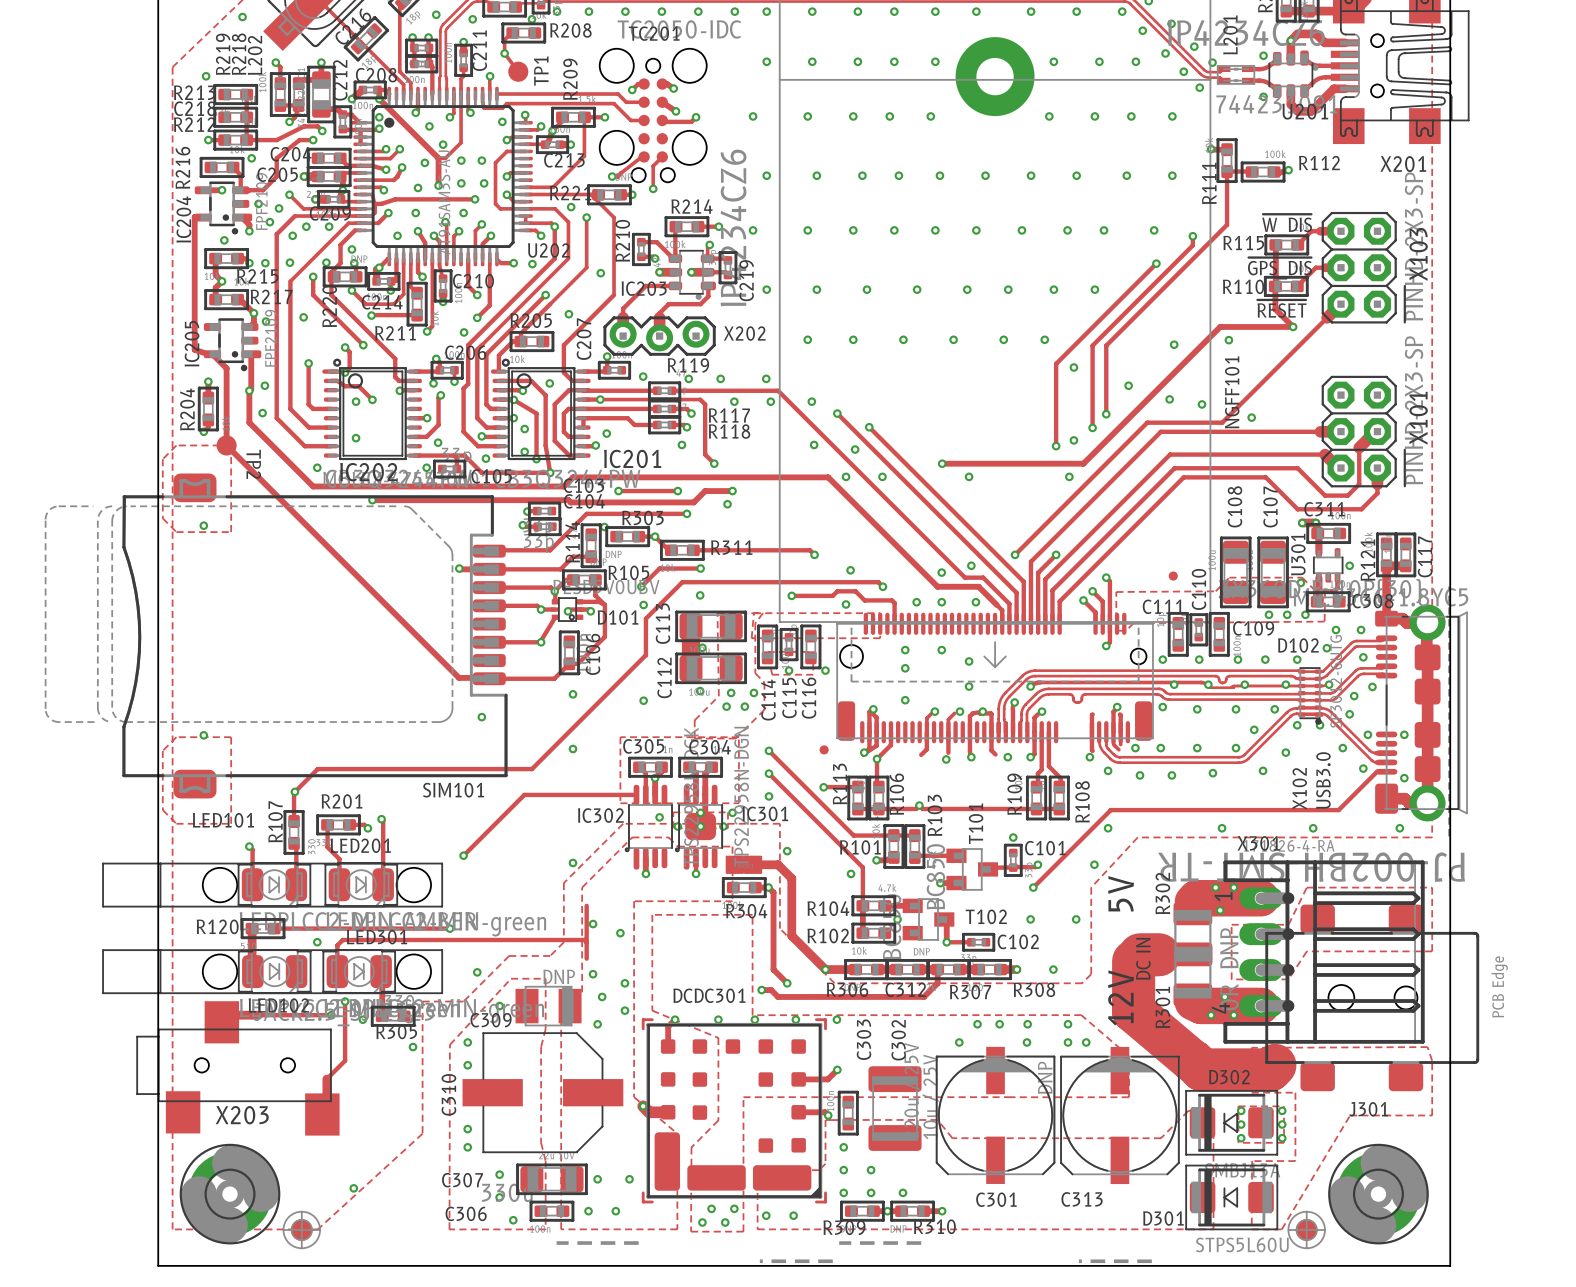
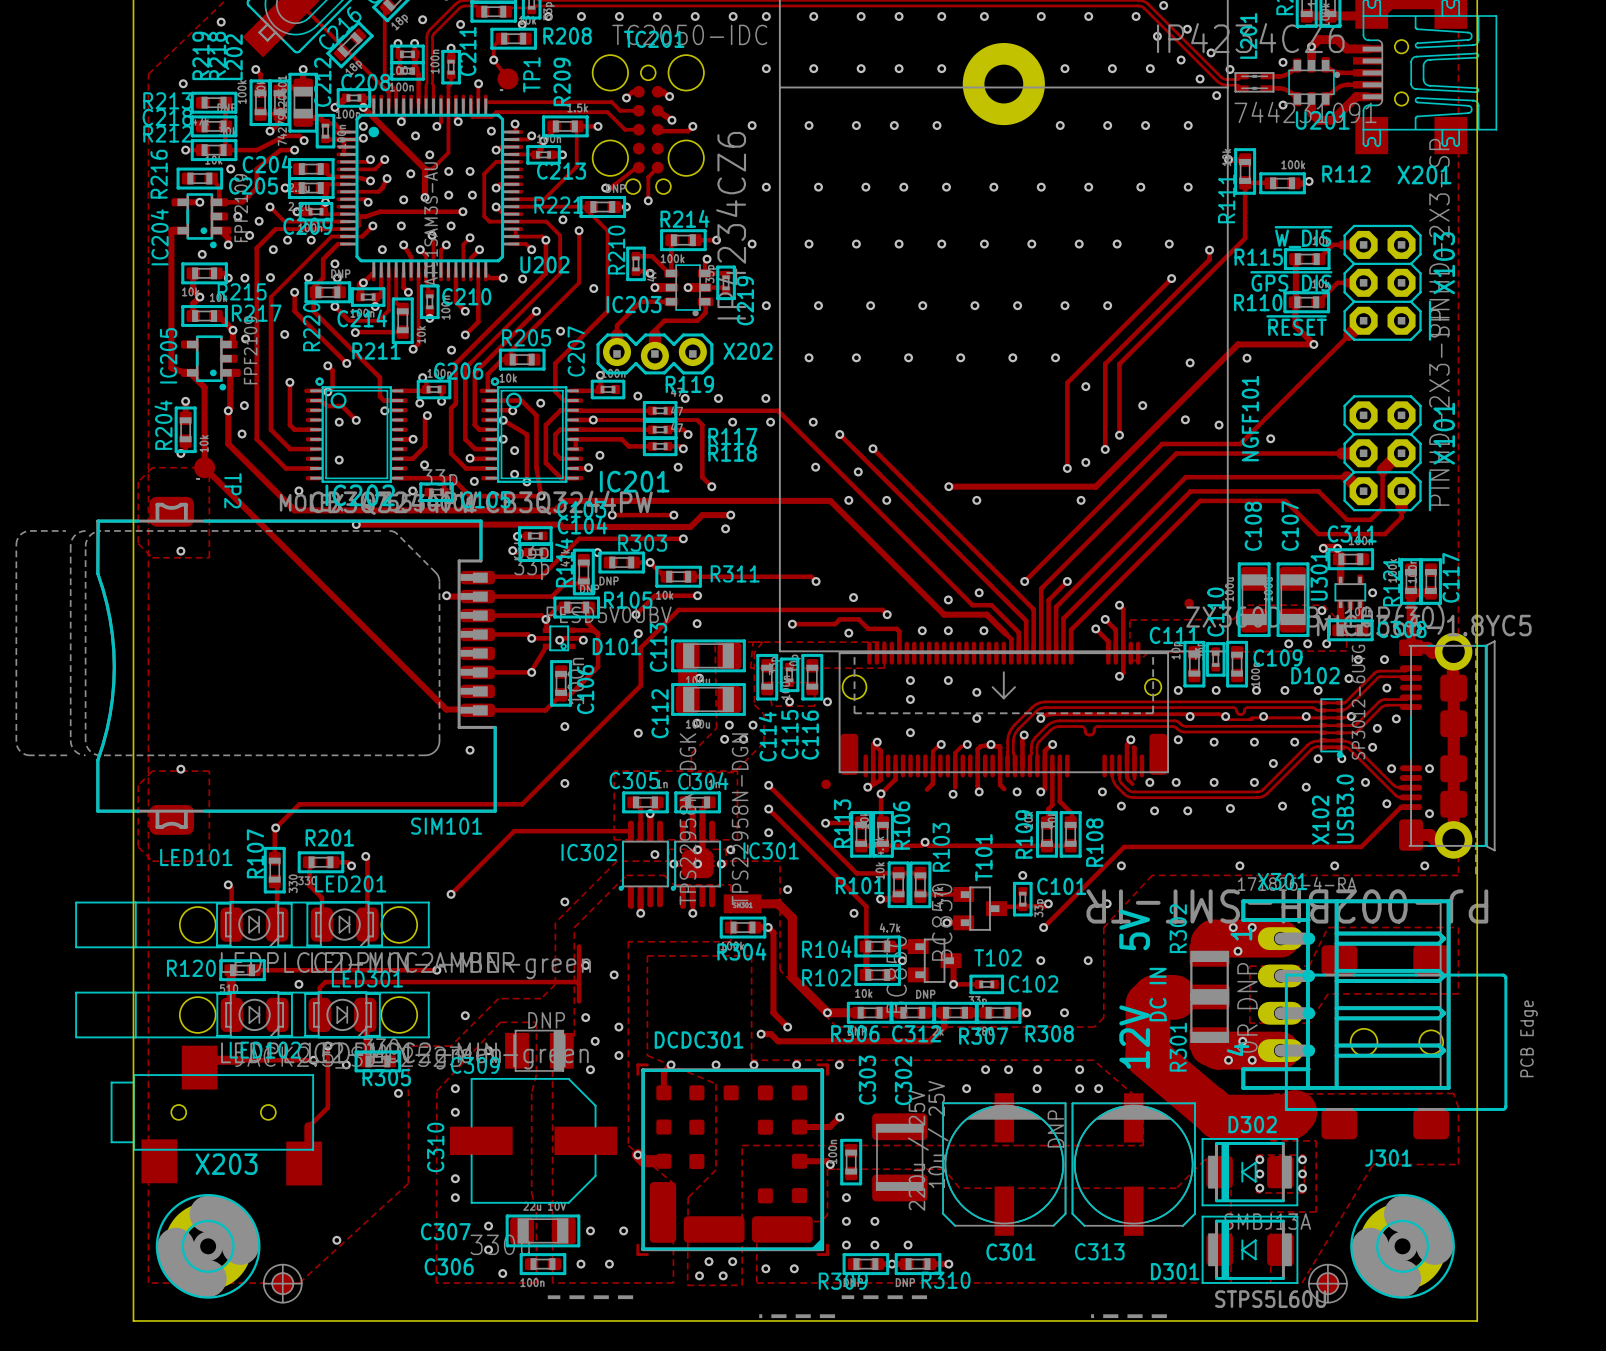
track: (1092, 714) (1092, 750) -> none

